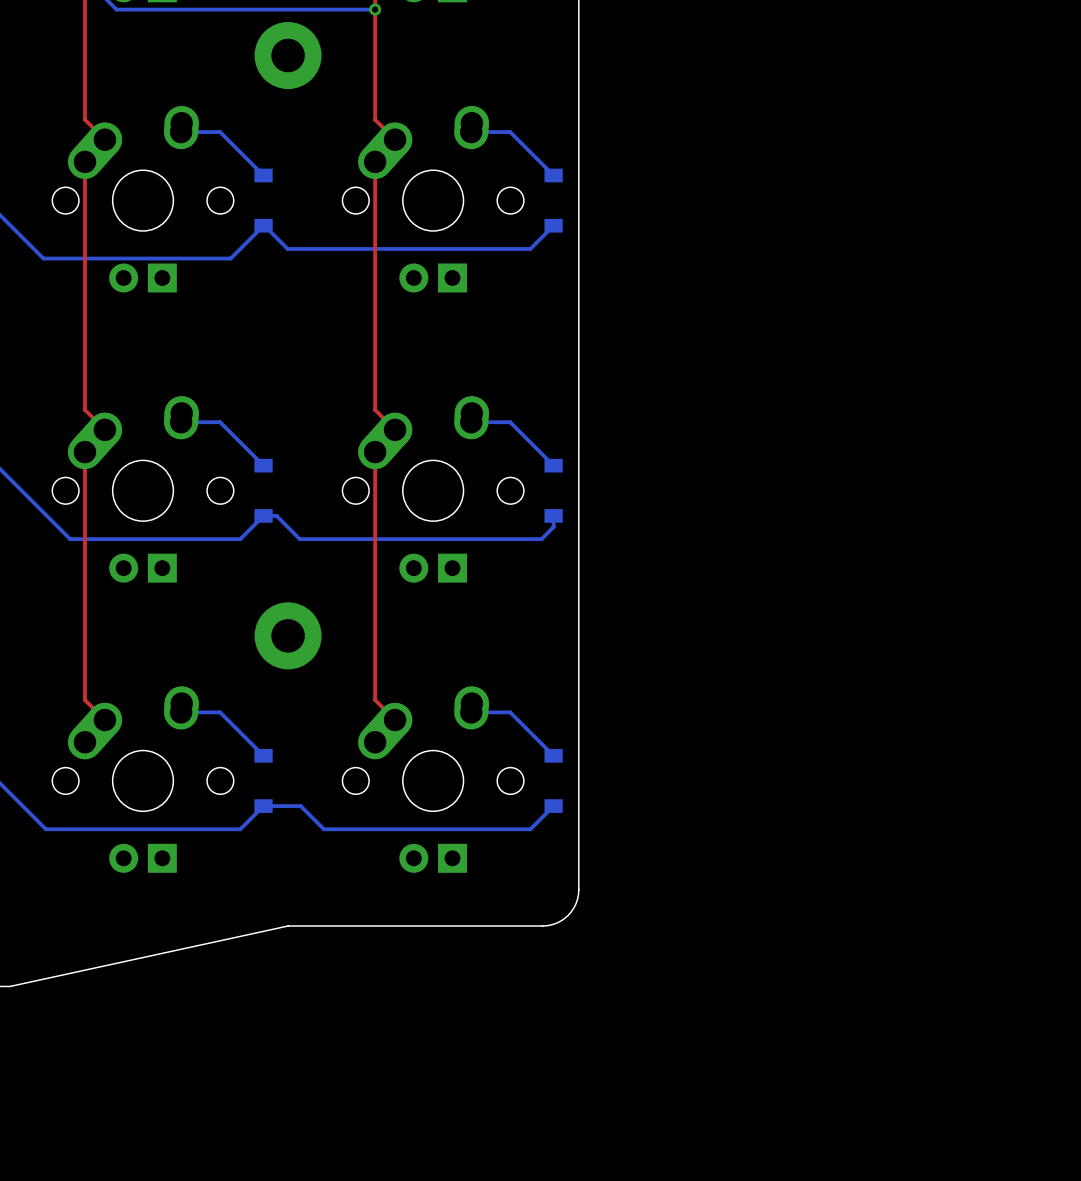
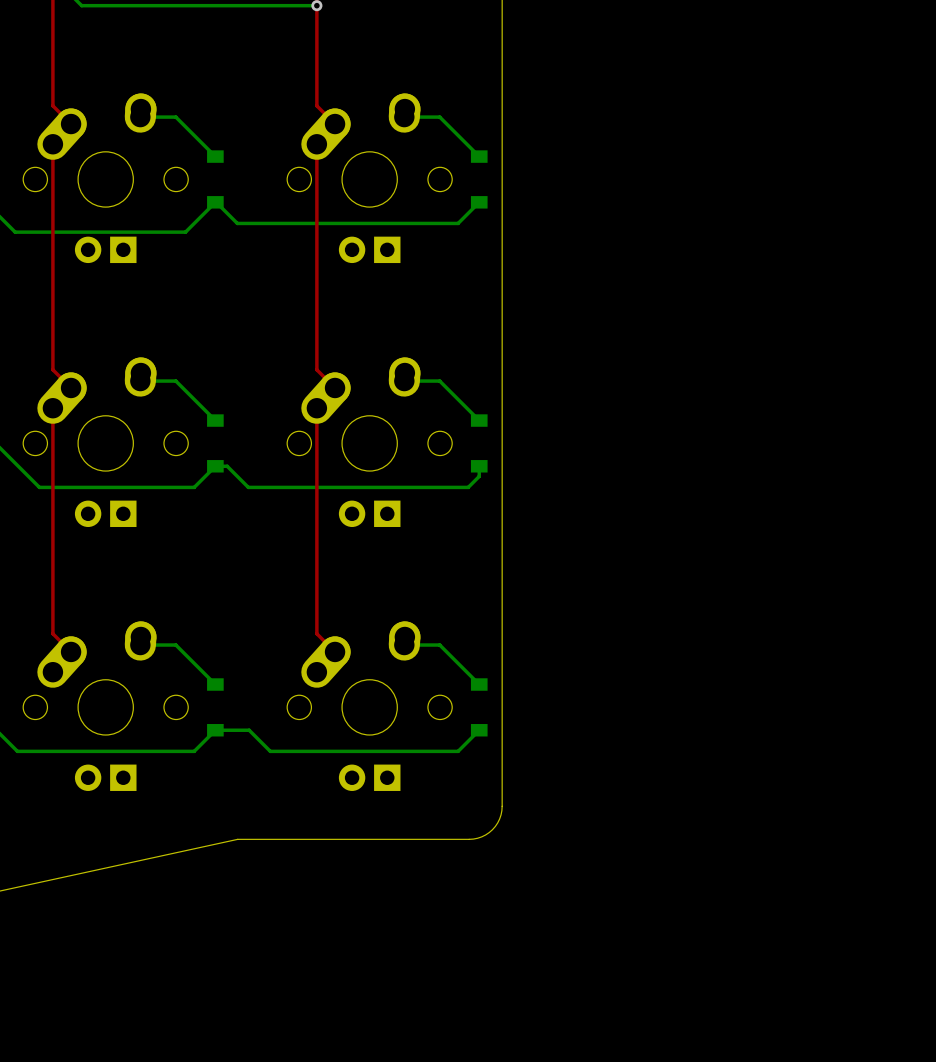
part: (288, 55) -> none
part: (288, 635) -> none

